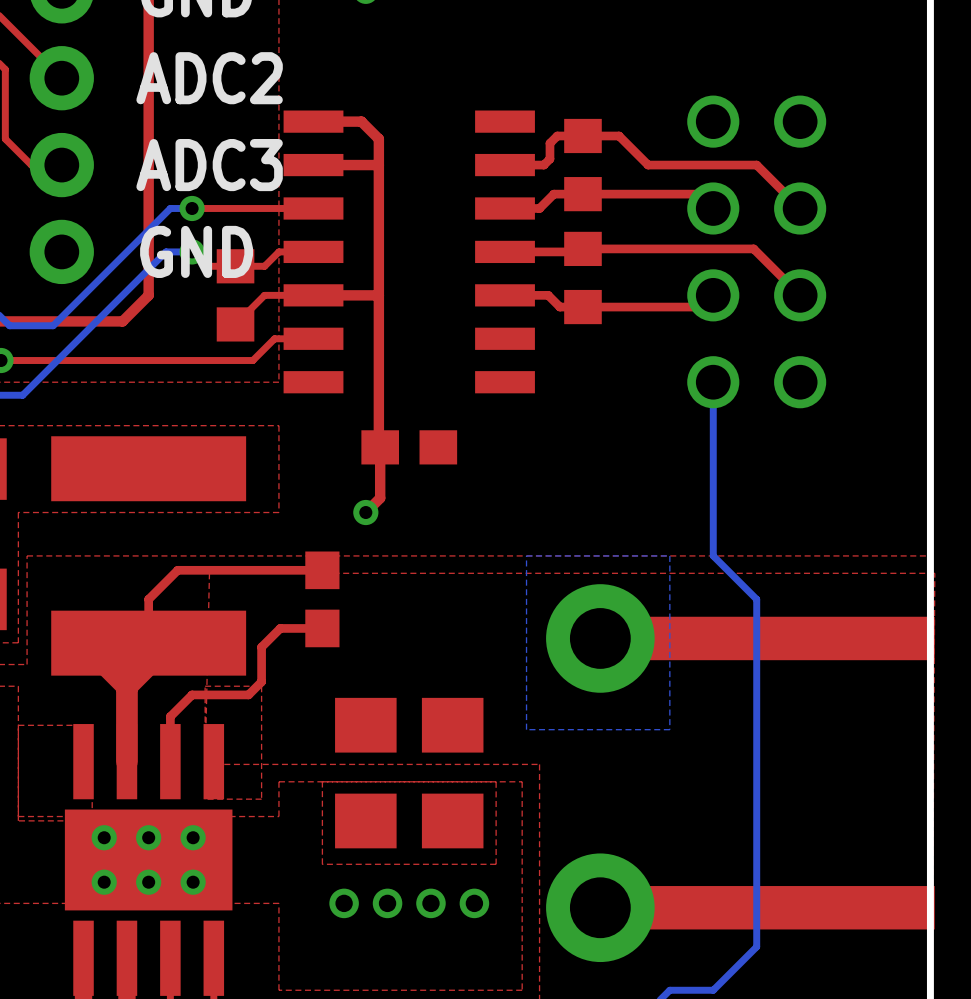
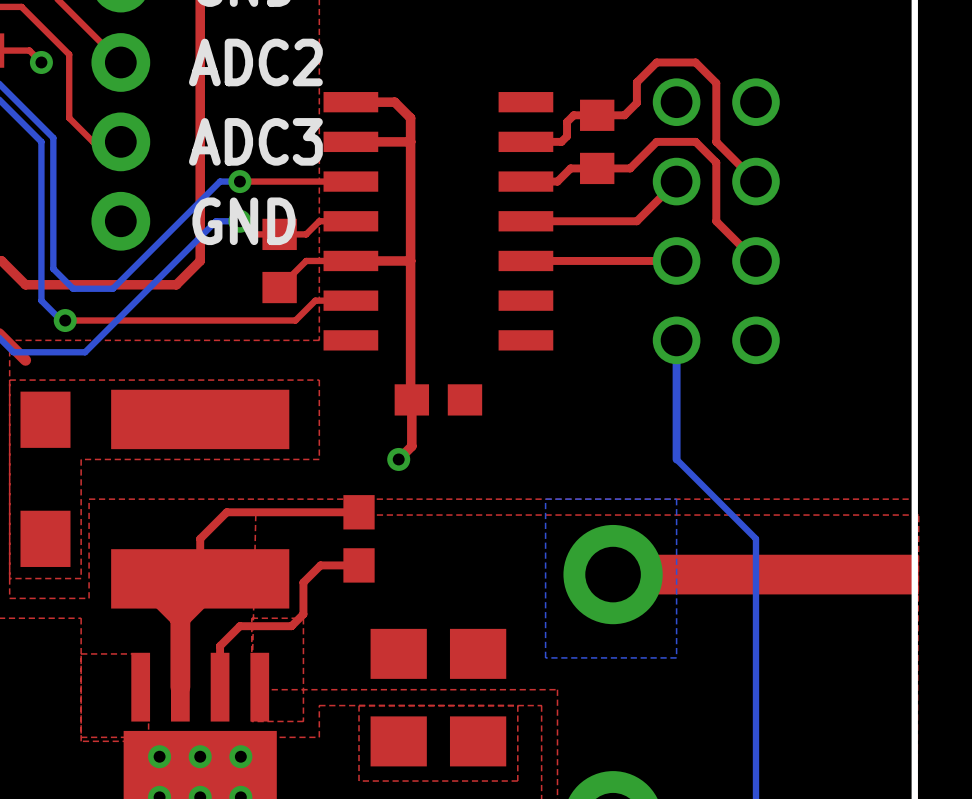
top track: (612, 135) (619, 135) (648, 165) -> (630, 168) (656, 141)
top track: none -> (624, 115) (636, 102) (636, 82) (656, 62) (695, 62) (716, 83) (716, 141) (755, 181)
top track: (690, 165) (756, 165) (800, 208) -> (695, 141) (716, 162) (716, 221) (755, 260)
top track: (619, 194) (698, 194) (713, 208) -> none
top track: (579, 251) (582, 248) (753, 248) (800, 295) -> (594, 221) (636, 221) (676, 181)
part position: (756, 251) -> (716, 221)
part: (582, 277) -> none
top track: (713, 295) (701, 307) (559, 307) (548, 295) -> (676, 260) (565, 260)
bottom track: (713, 382) (713, 555) -> (676, 340) (676, 459) (716, 499)

